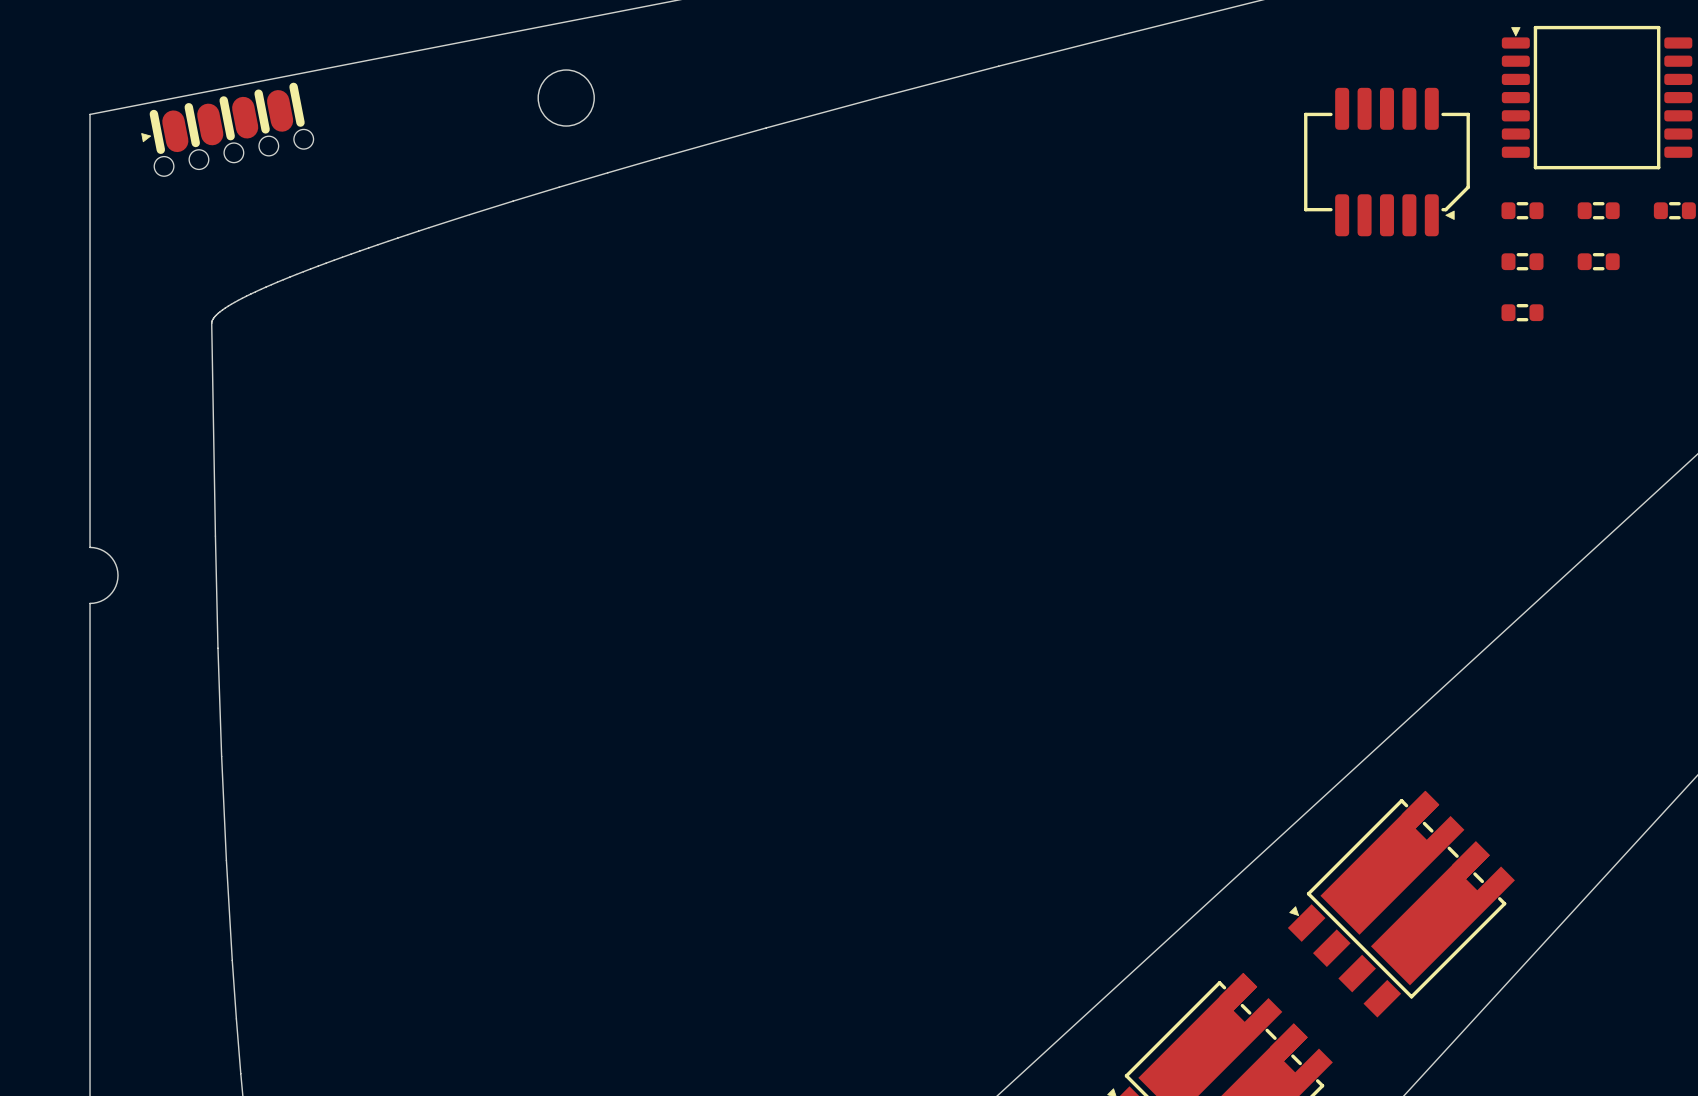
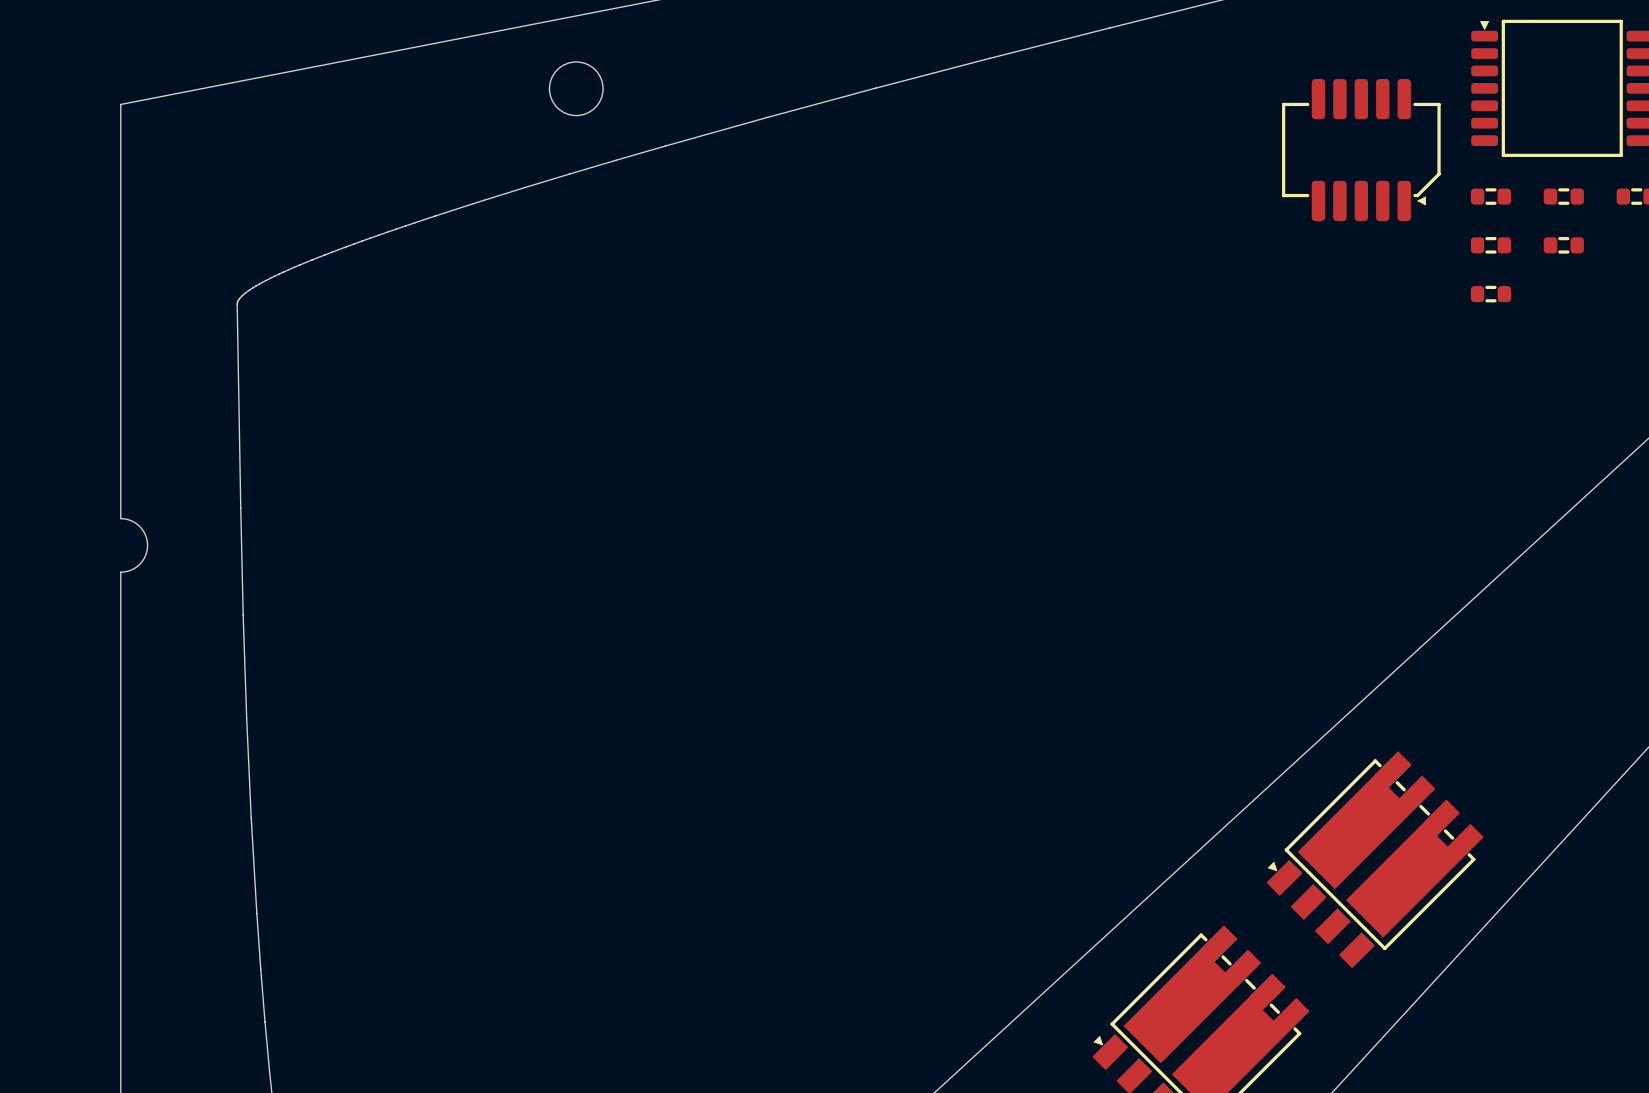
part: (227, 129) -> none

